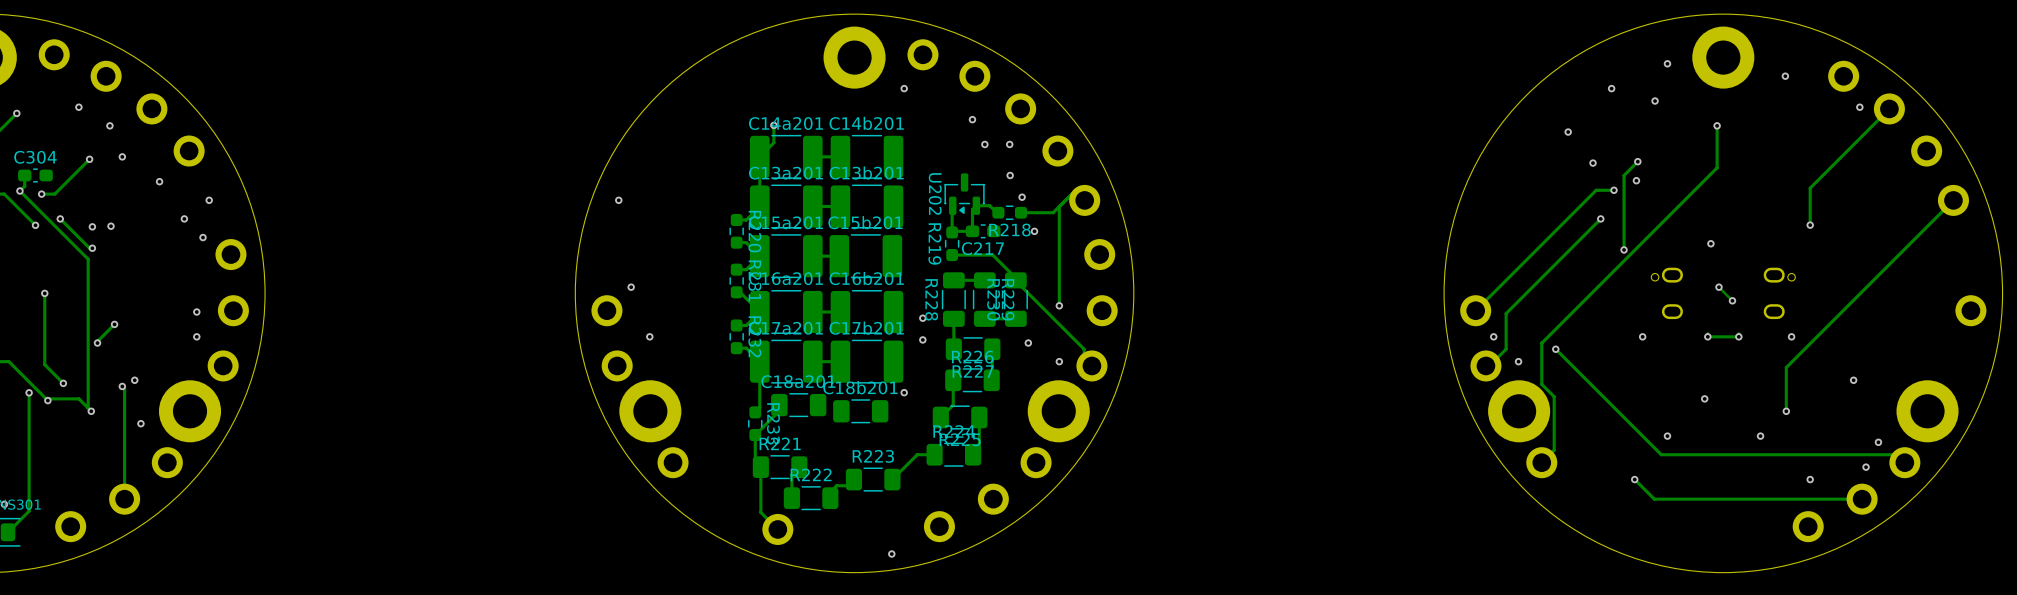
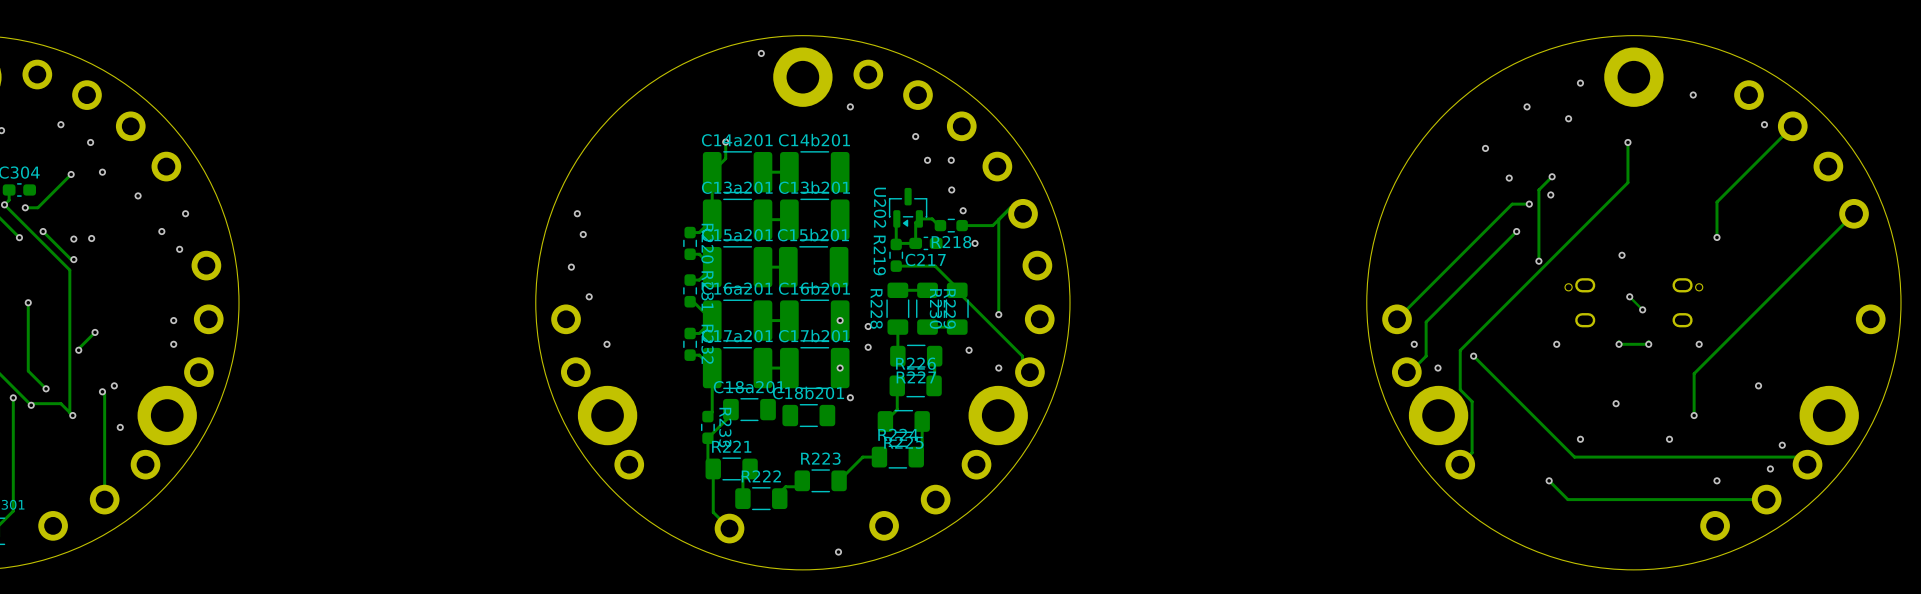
via: none -> (761, 53)
via: none -> (583, 234)
via: none -> (571, 267)
via: none -> (840, 320)
via: none -> (840, 368)

